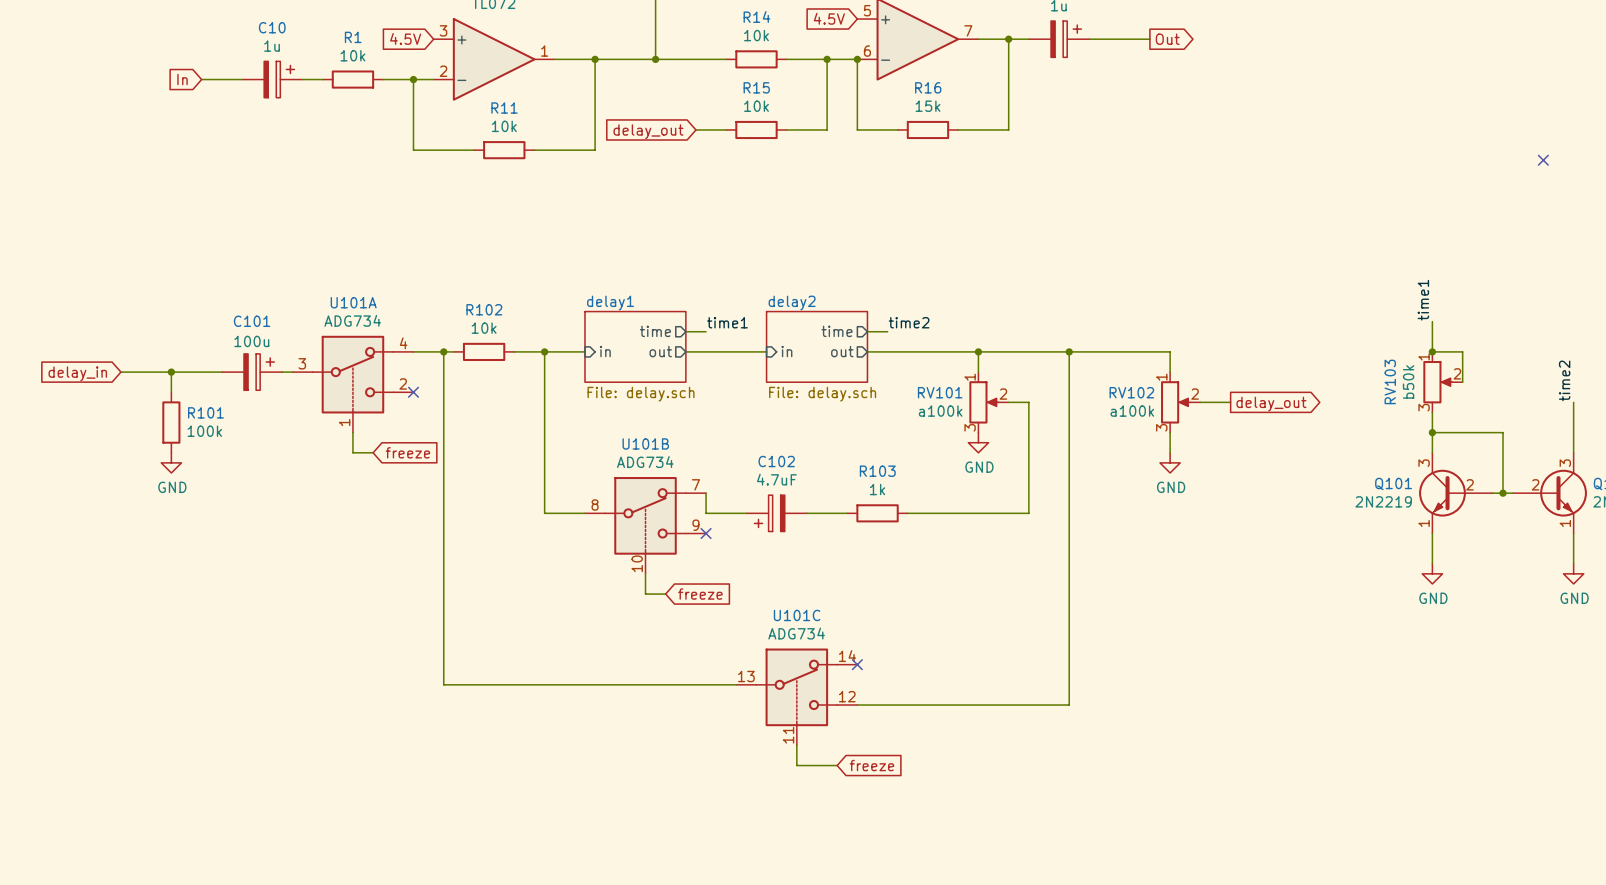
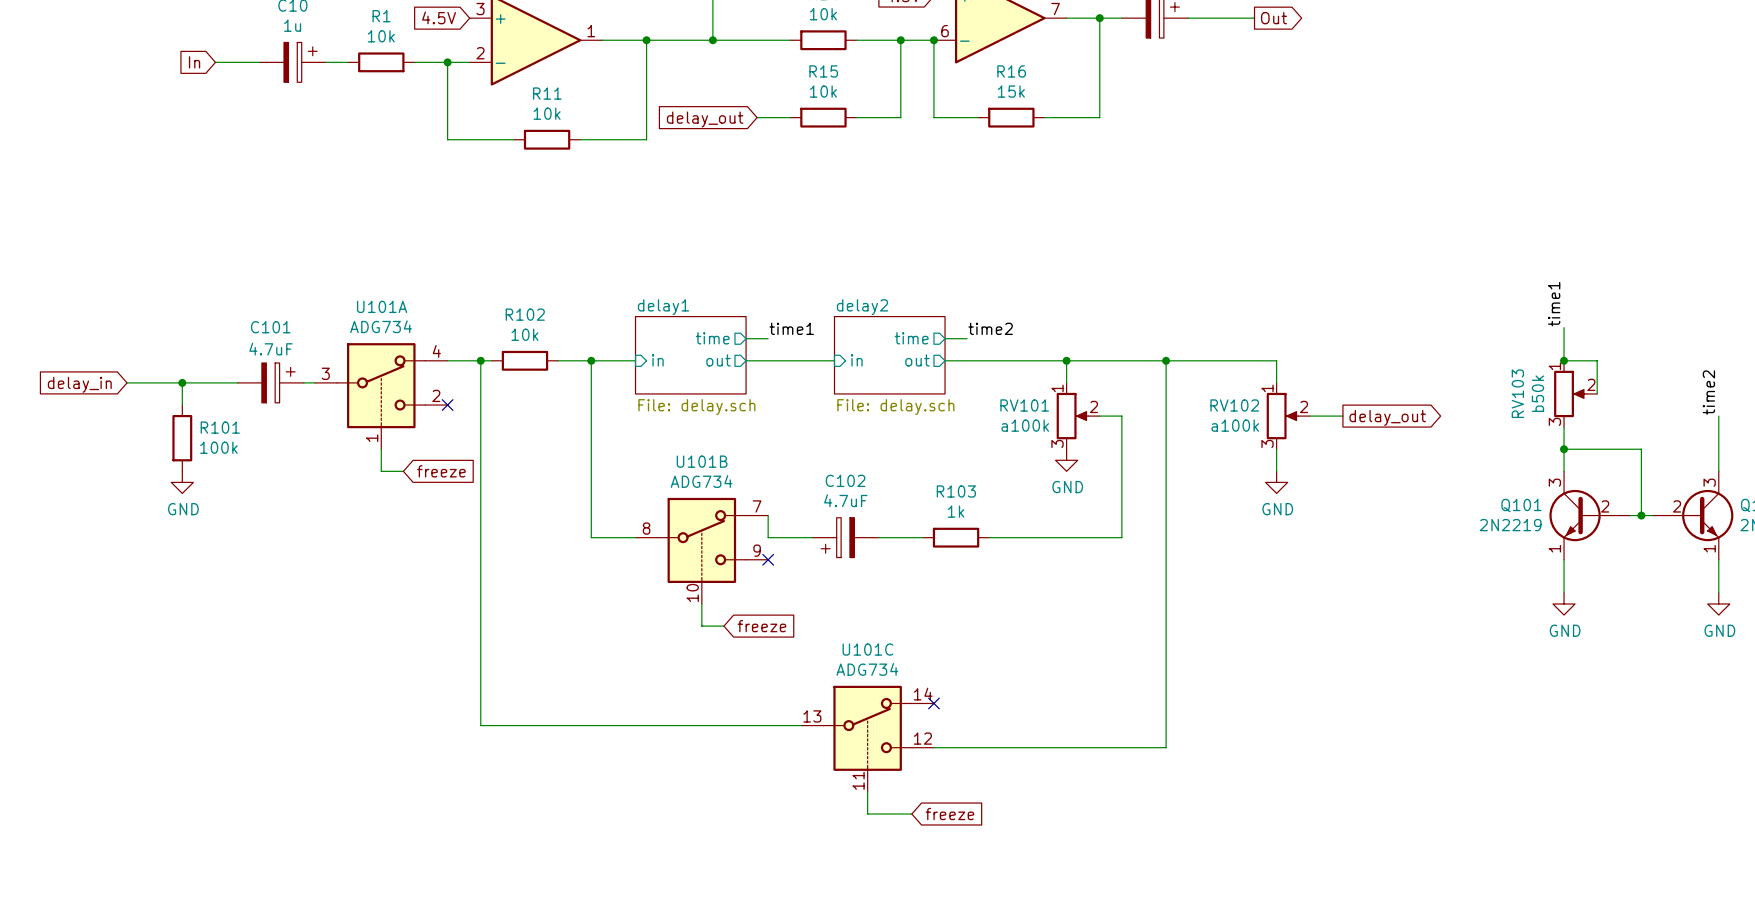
no-connect mark: (1543, 160) -> none
C101 value: 100u (251, 341) -> 4.7uF (271, 349)

